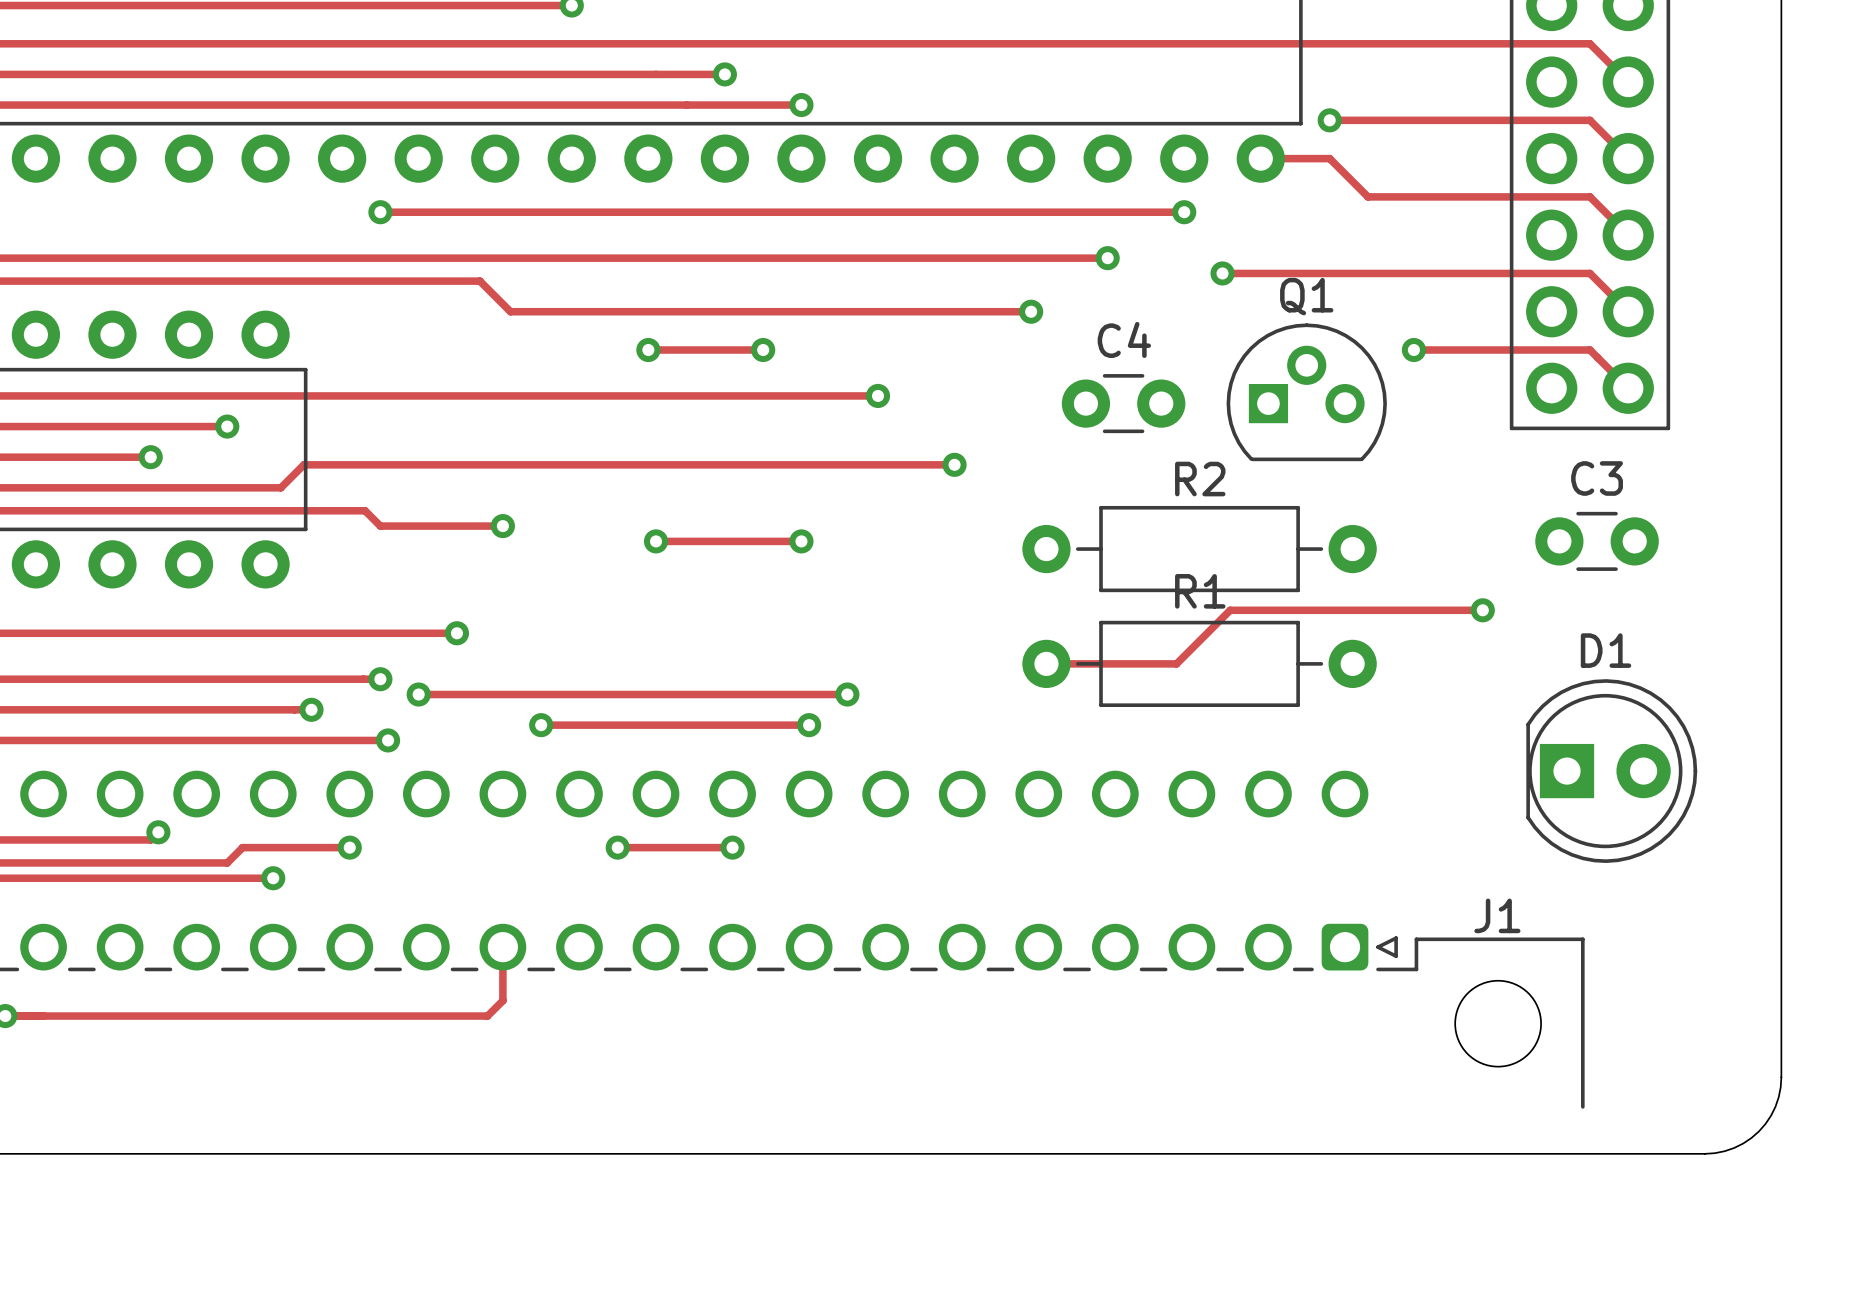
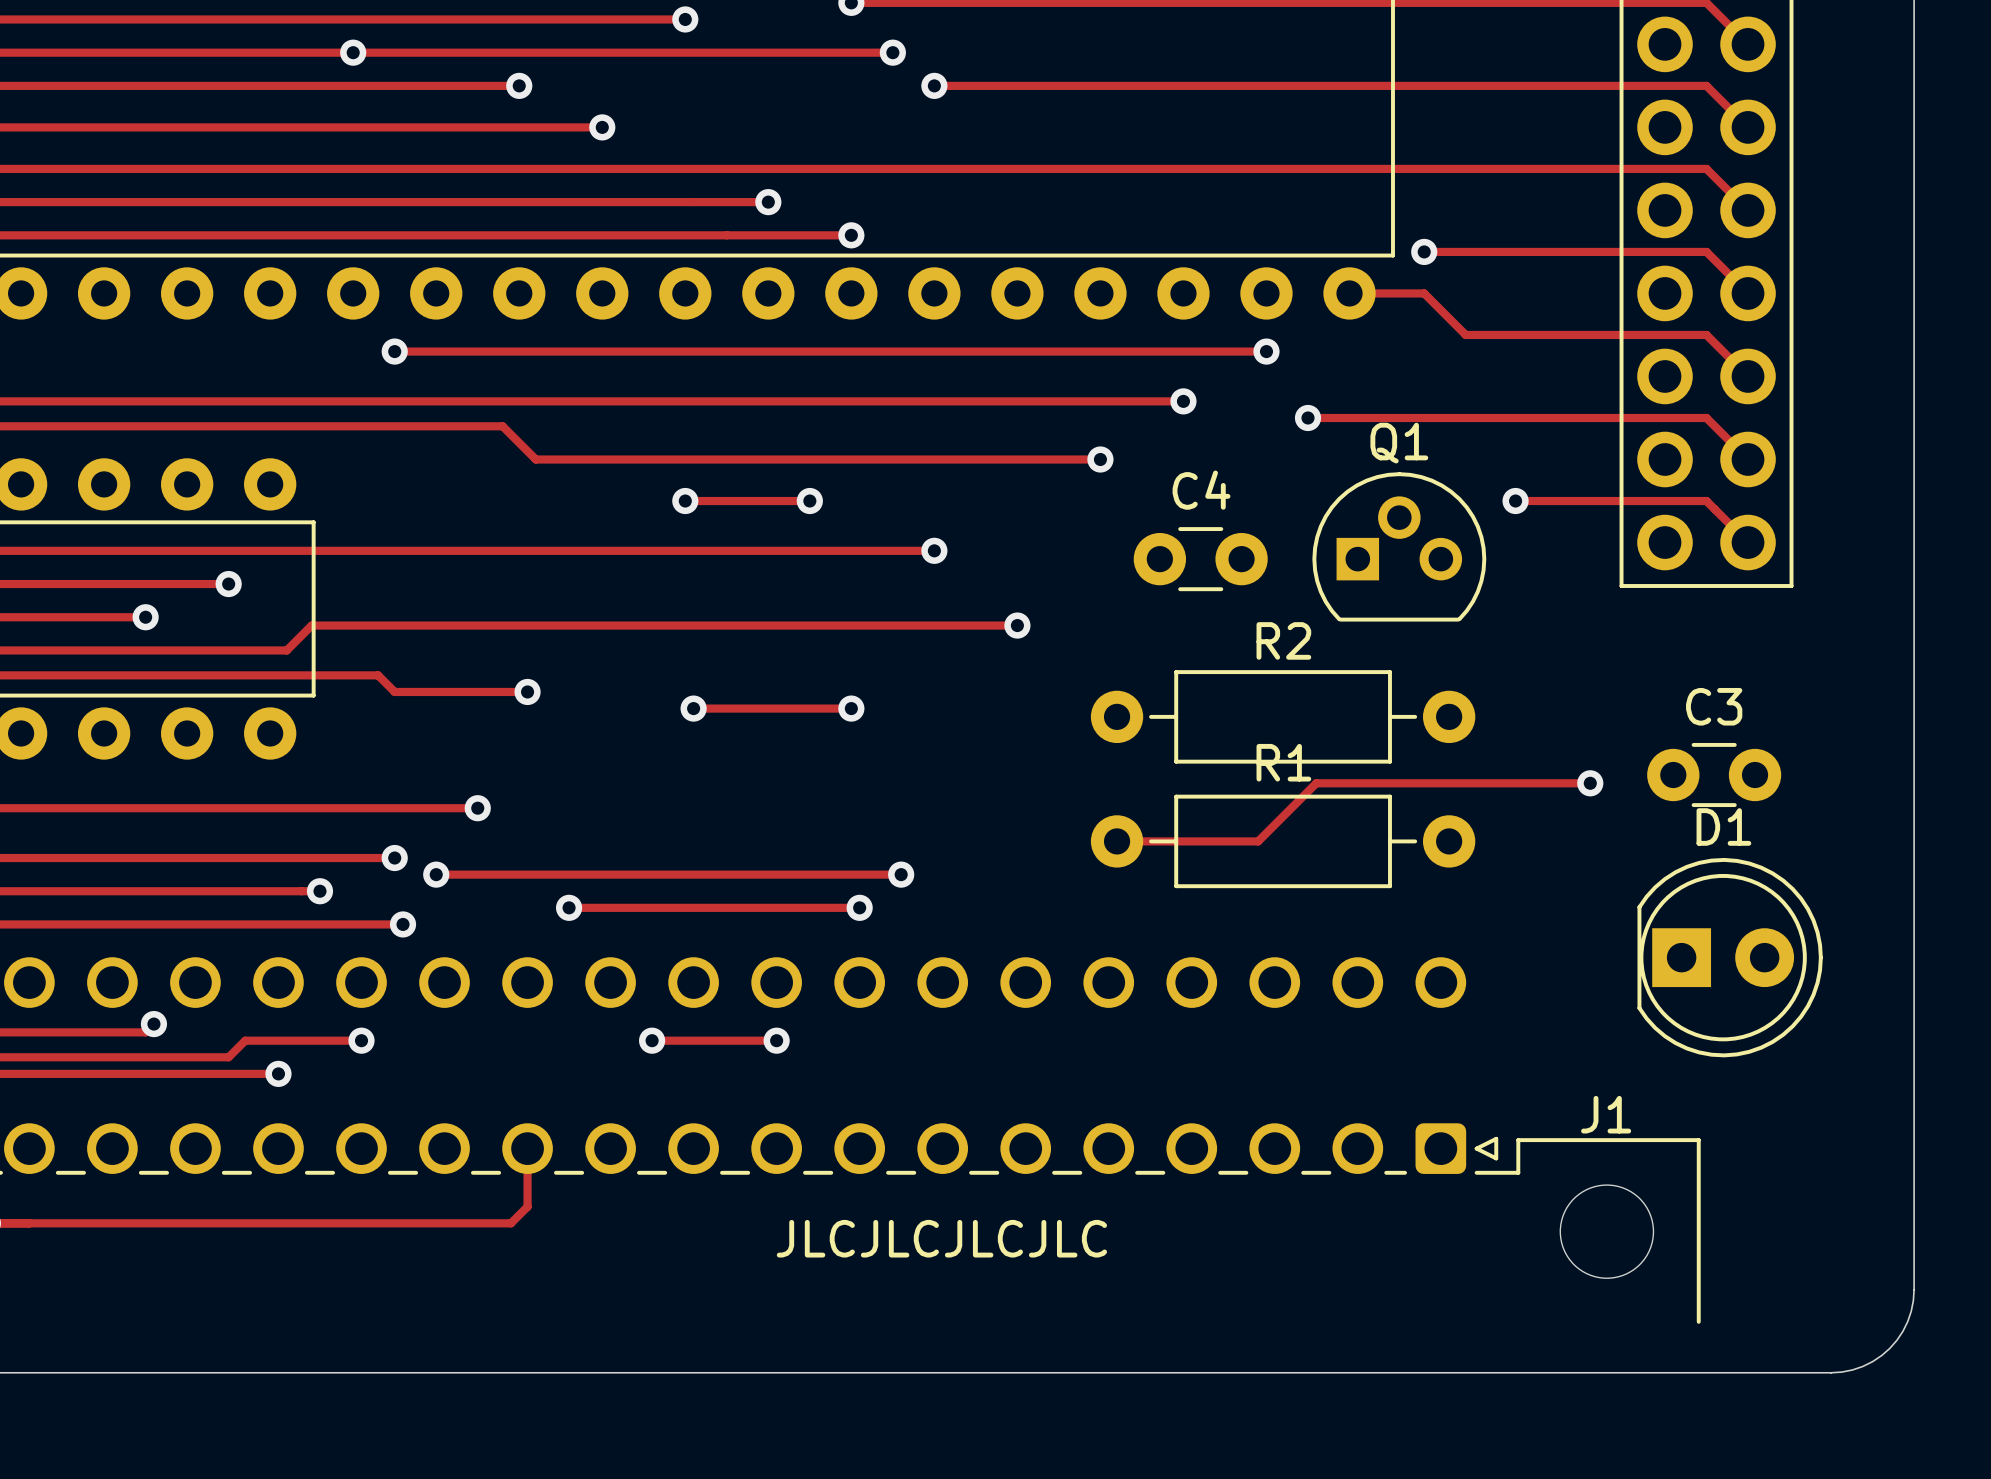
C3 position: (1597, 541) -> (1714, 775)
text: none -> JLCJLCJLCJLC (941, 1238)

